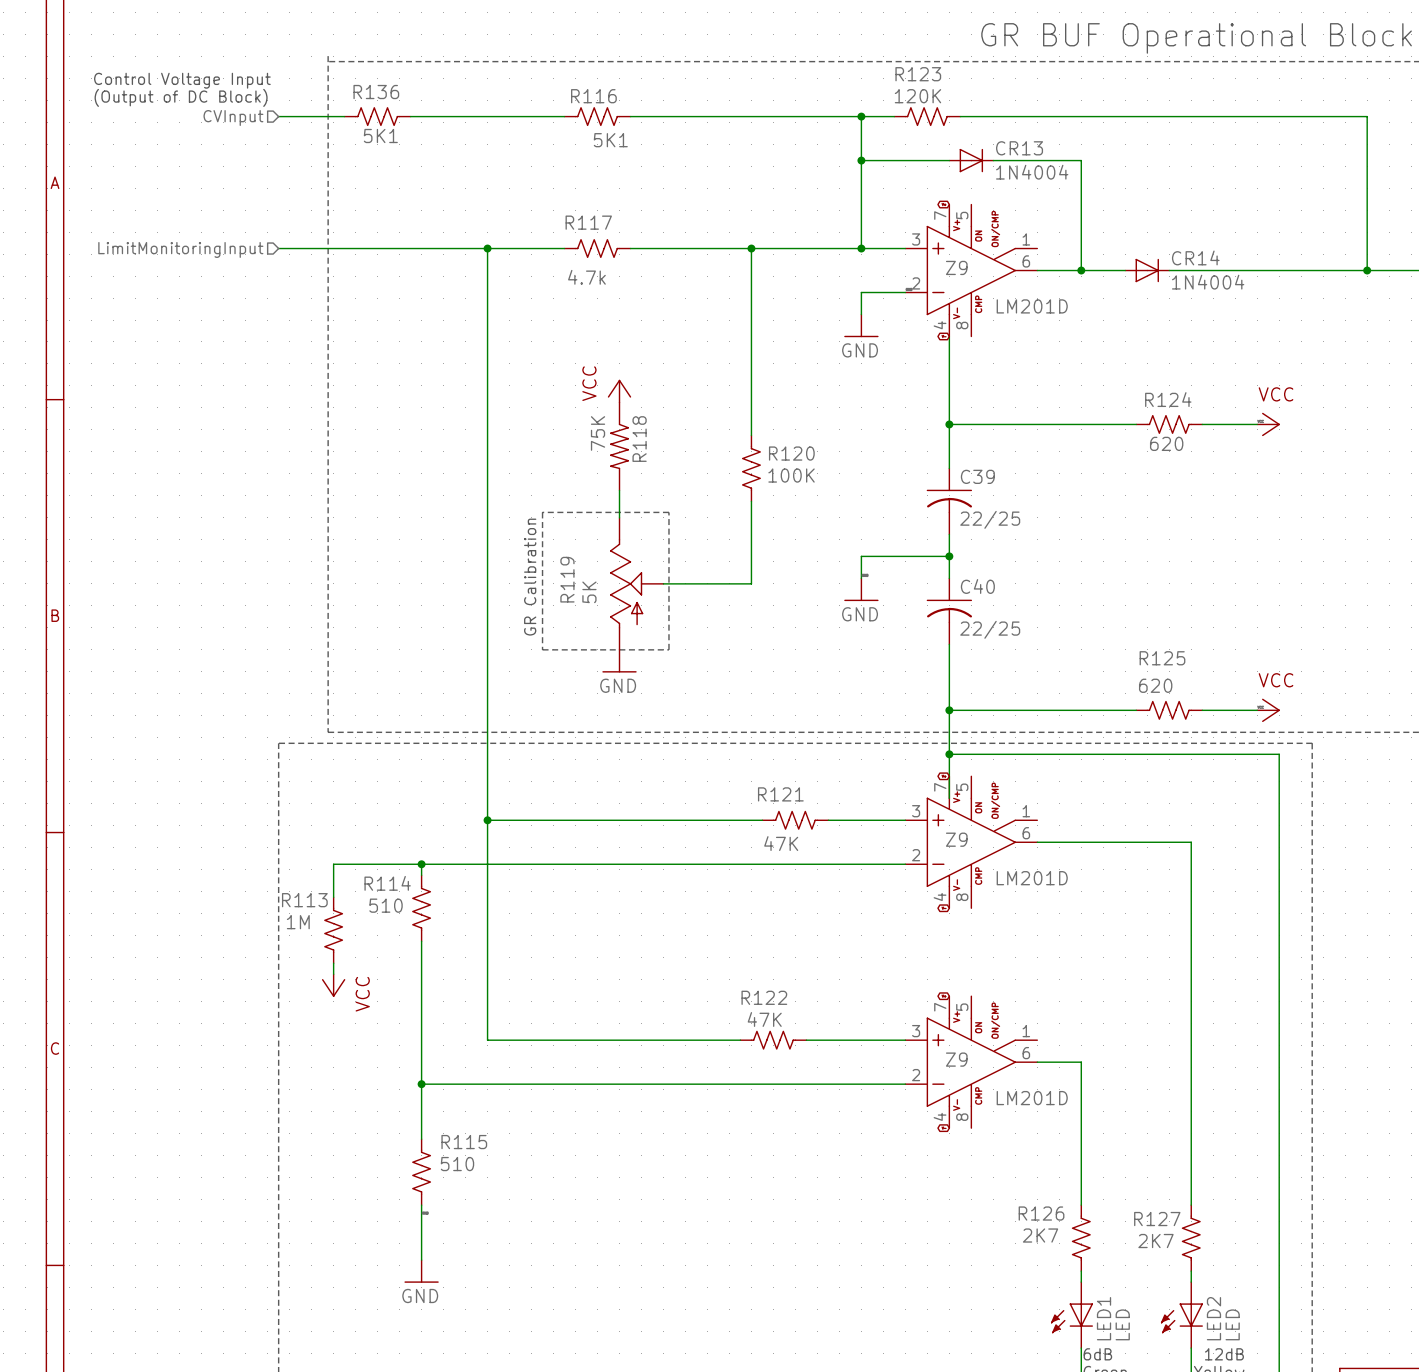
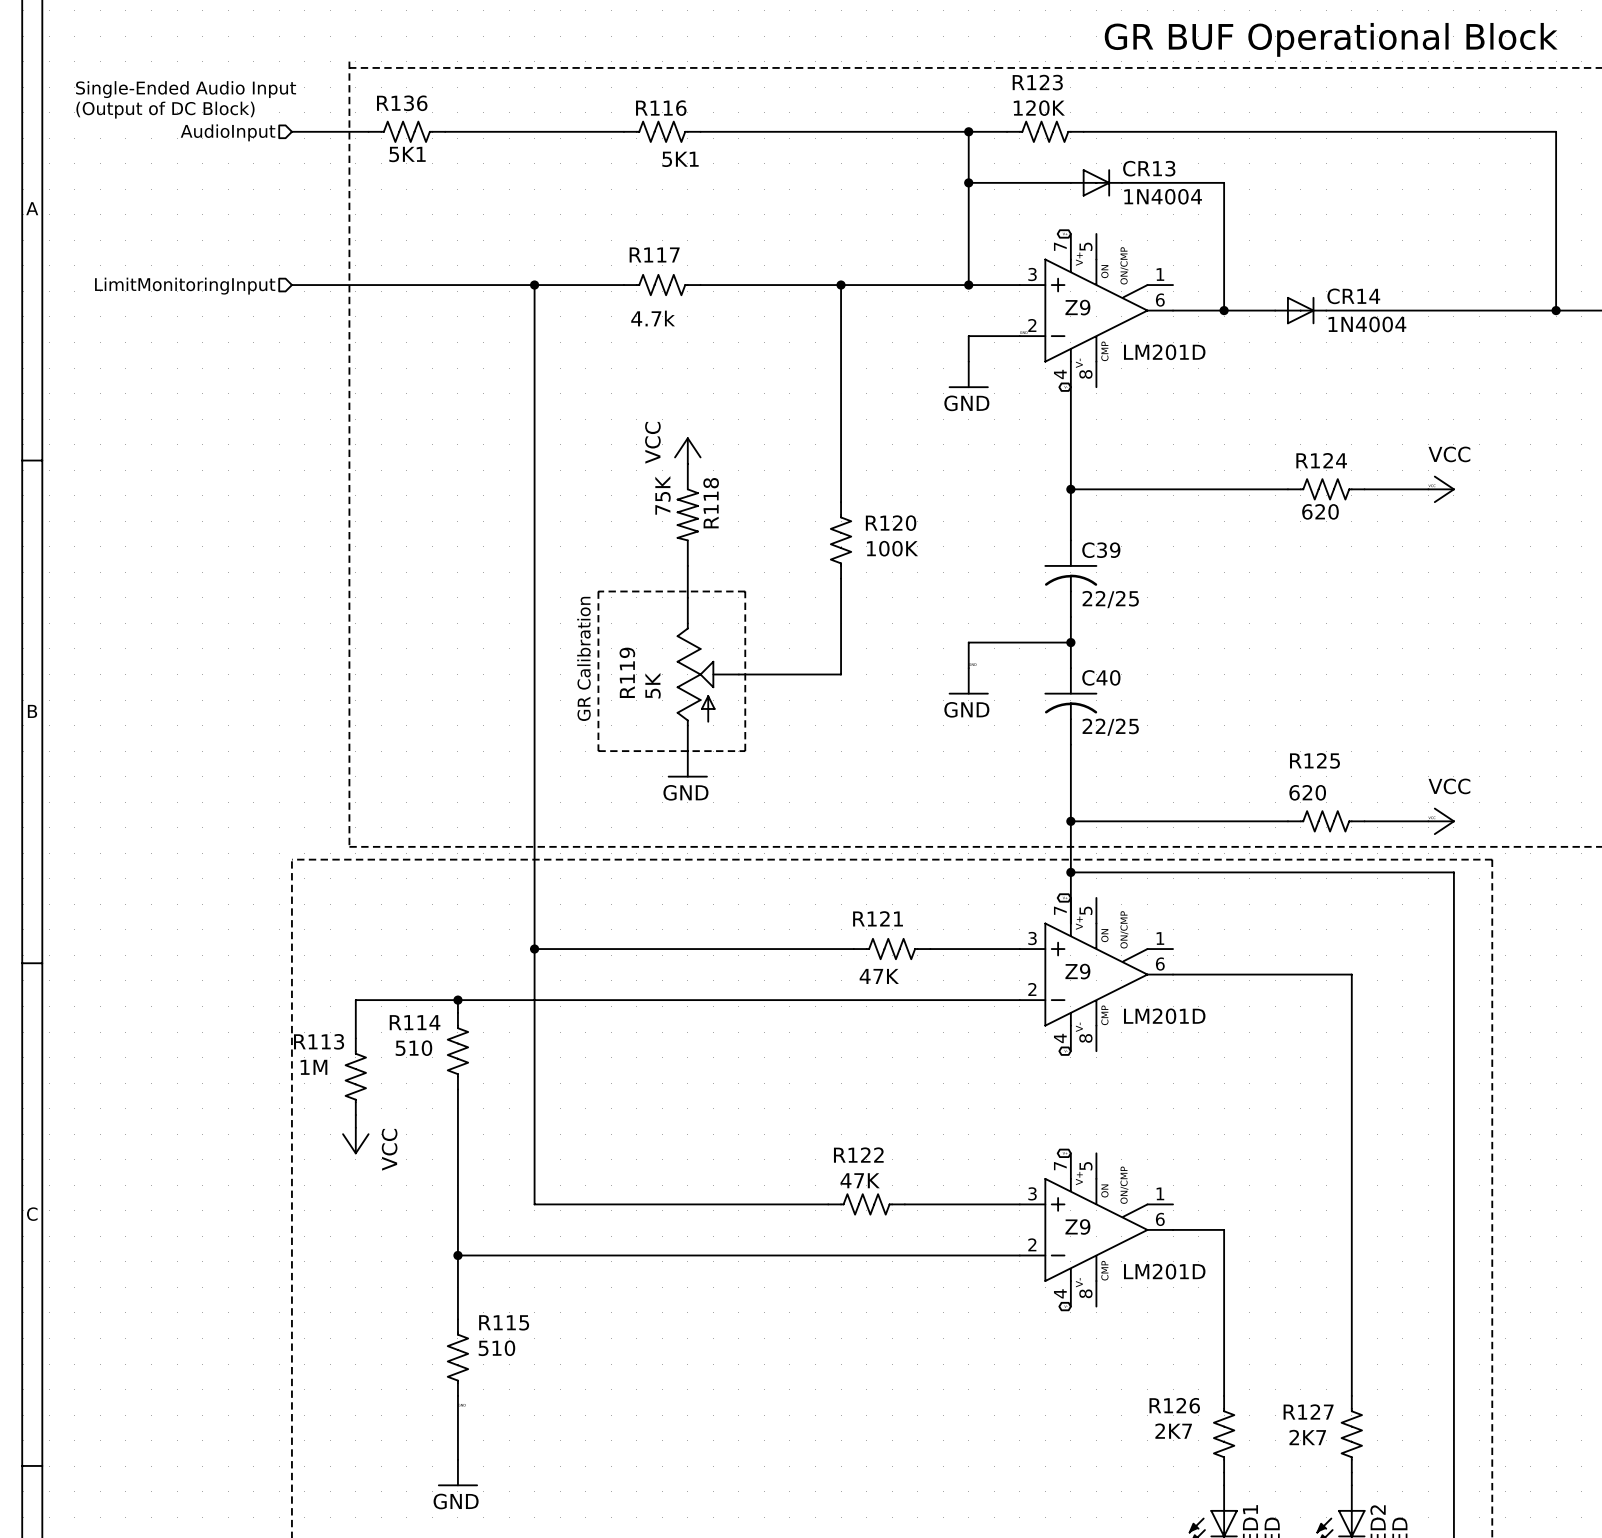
text: Control Voltage Input (182, 80) -> Single-Ended Audio Input (186, 89)
hierarchical label: CVInput (233, 118) -> AudioInput (228, 132)

